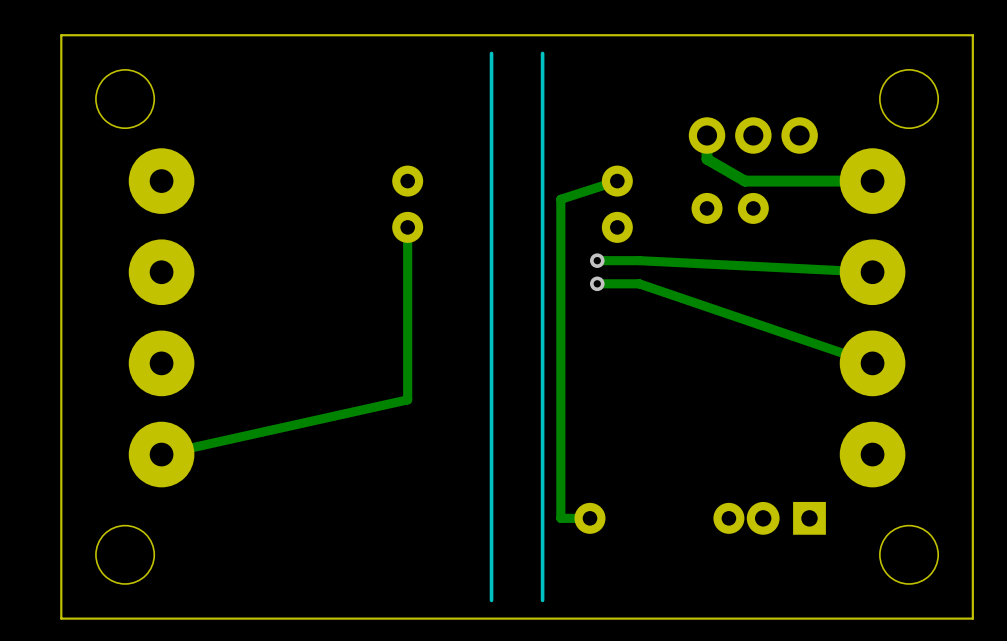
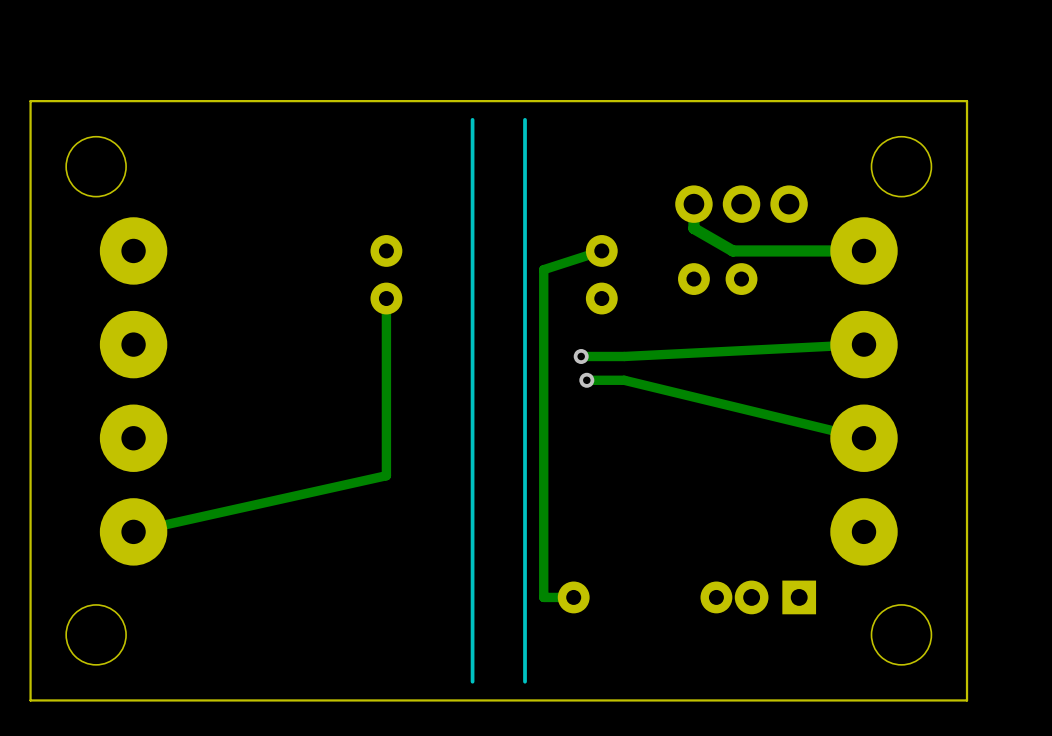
track: (597, 260) (639, 260) (872, 272) -> (624, 356) (864, 344)
via position: (597, 260) -> (586, 380)
track: (639, 283) (872, 363) -> (586, 380) (624, 380) (864, 438)

